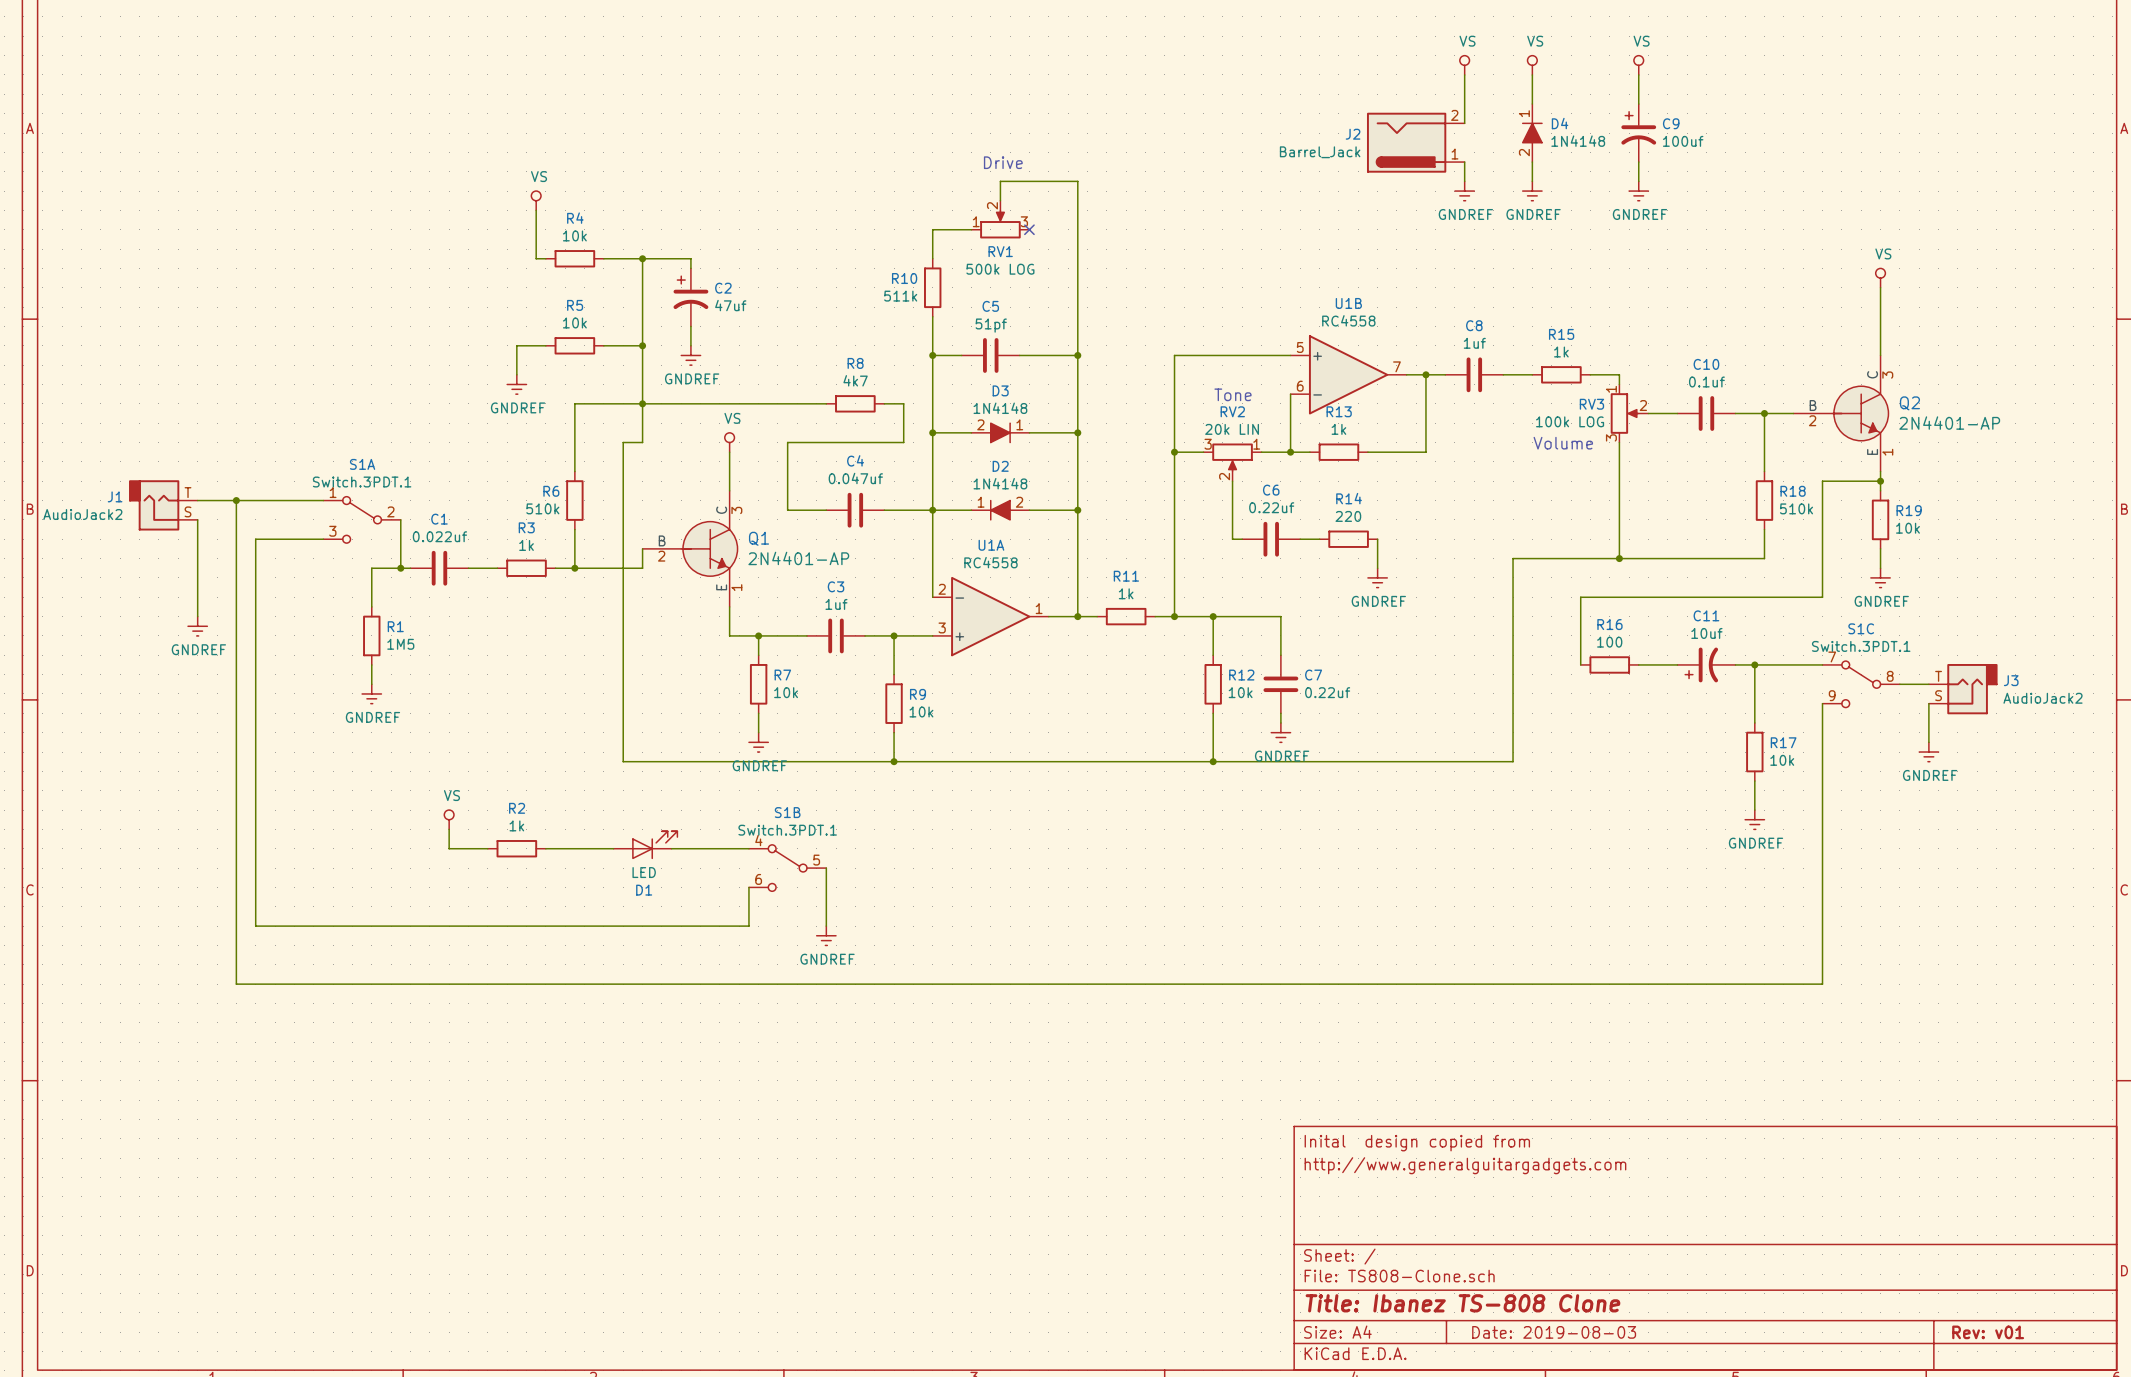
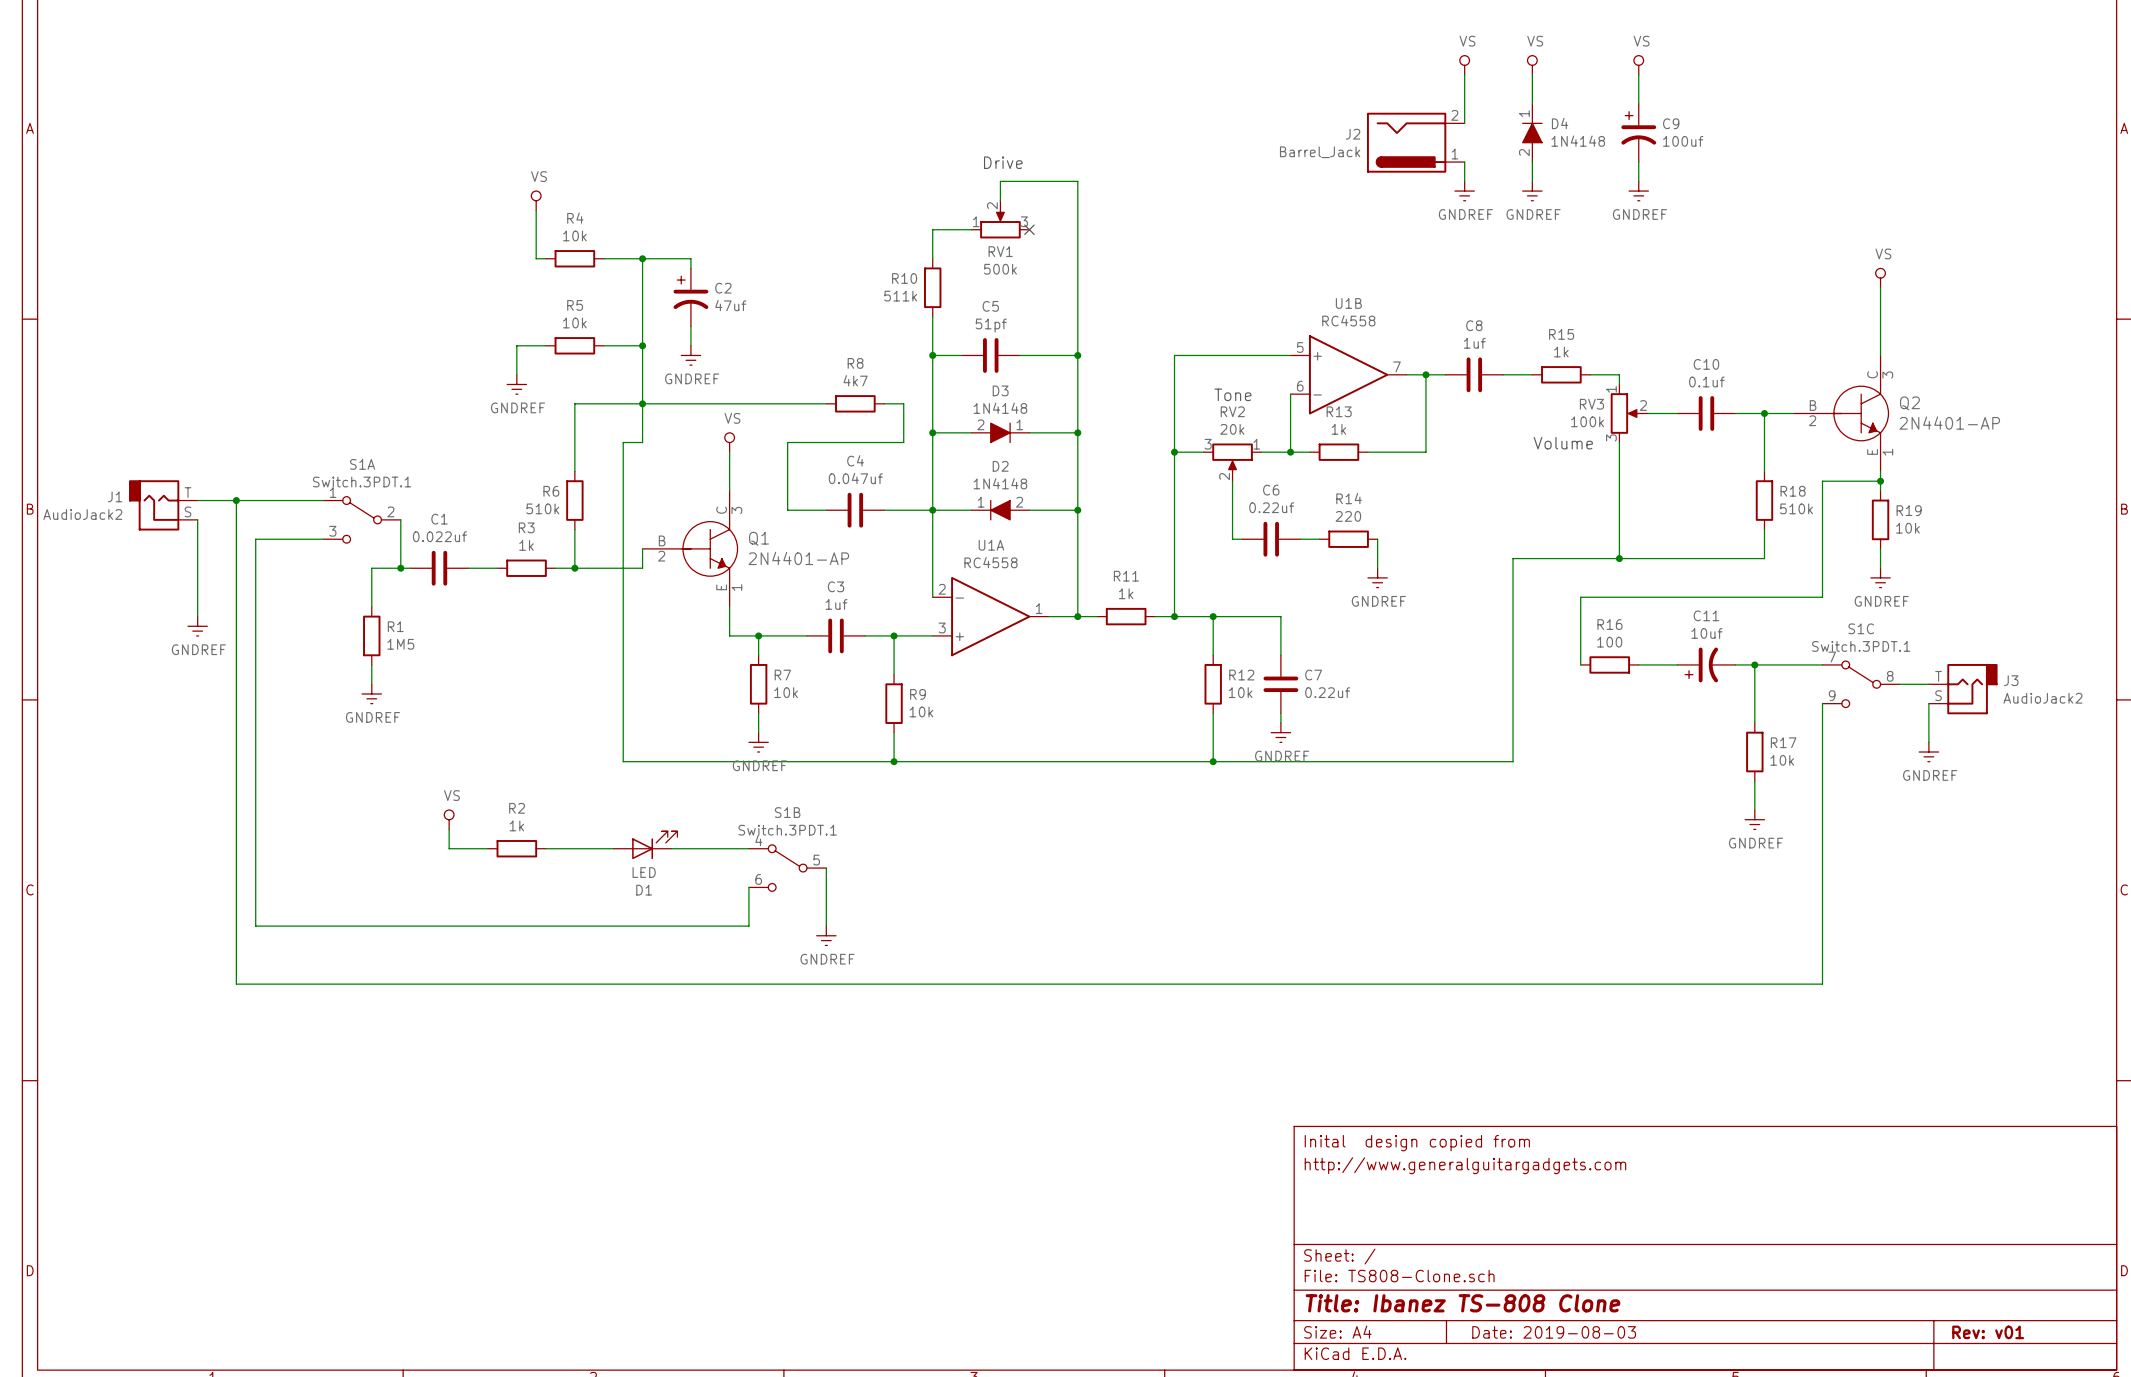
RV1 value: 500k LOG (1000, 269) -> 500k (1000, 269)
RV3 value: 100k LOG (1570, 421) -> 100k (1587, 421)
RV2 value: 20k LIN (1232, 429) -> 20k (1232, 429)

